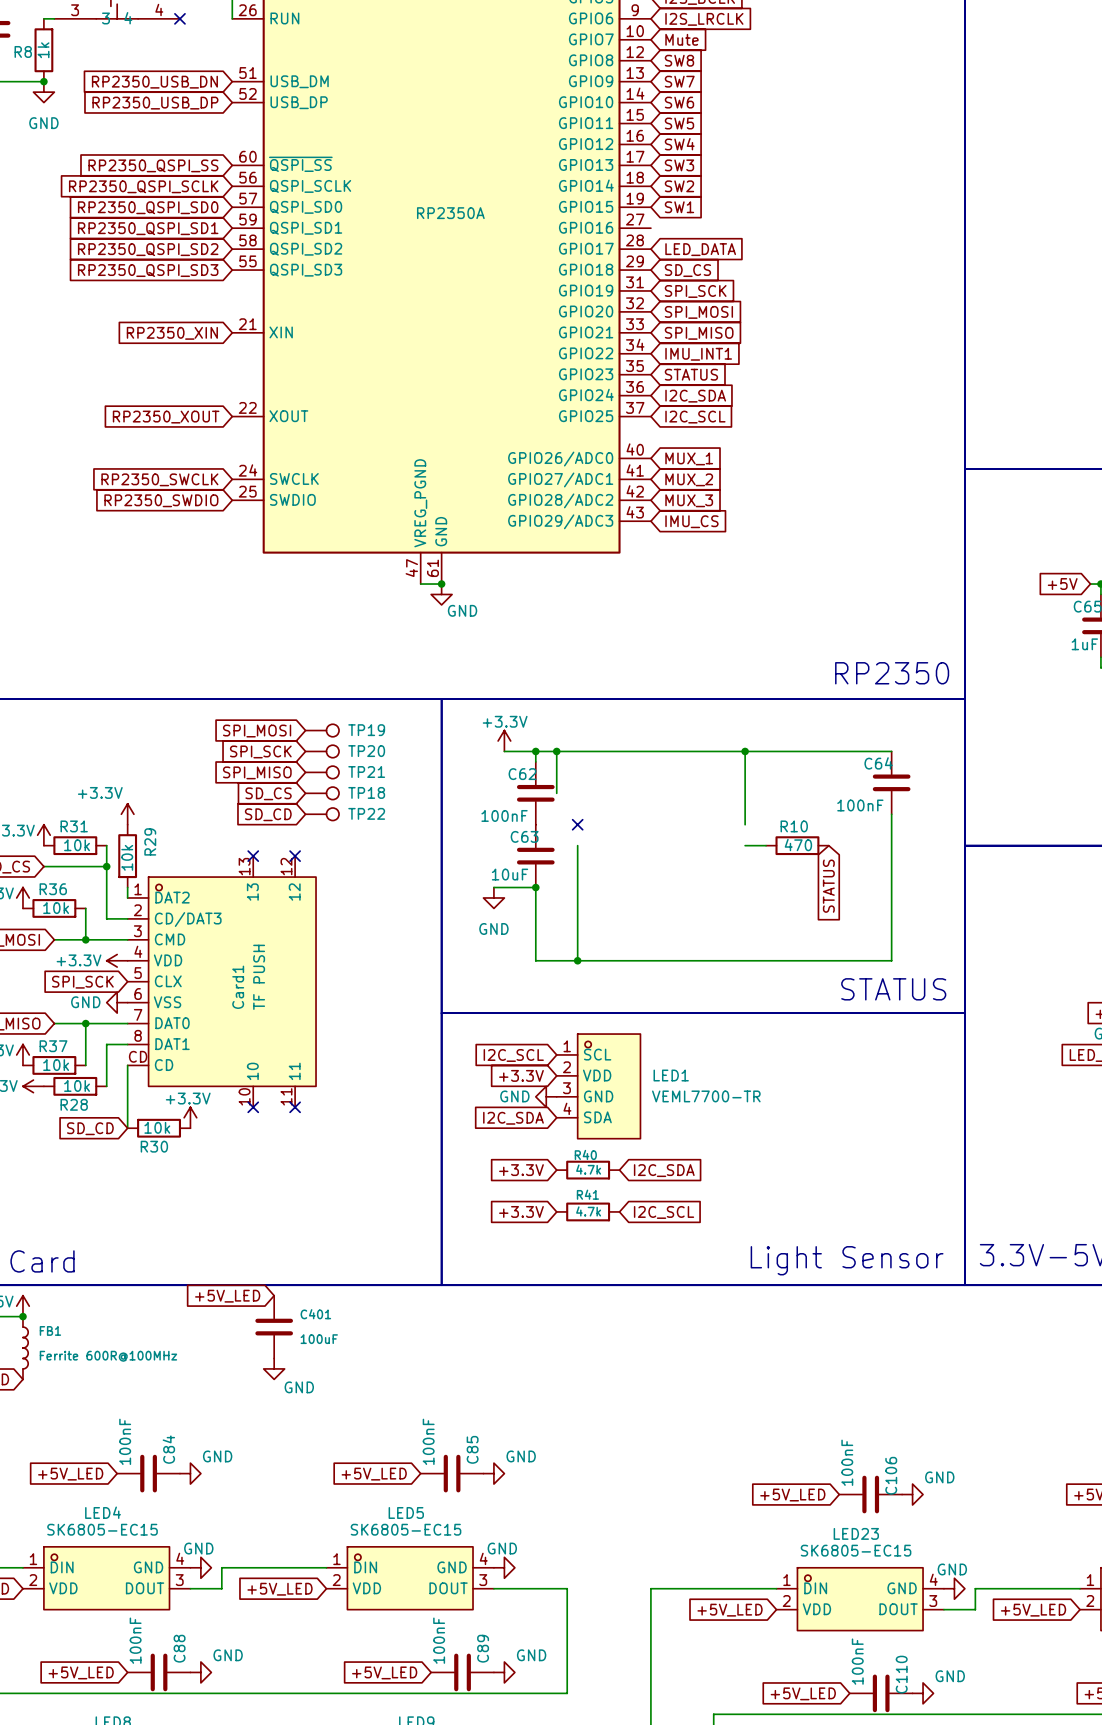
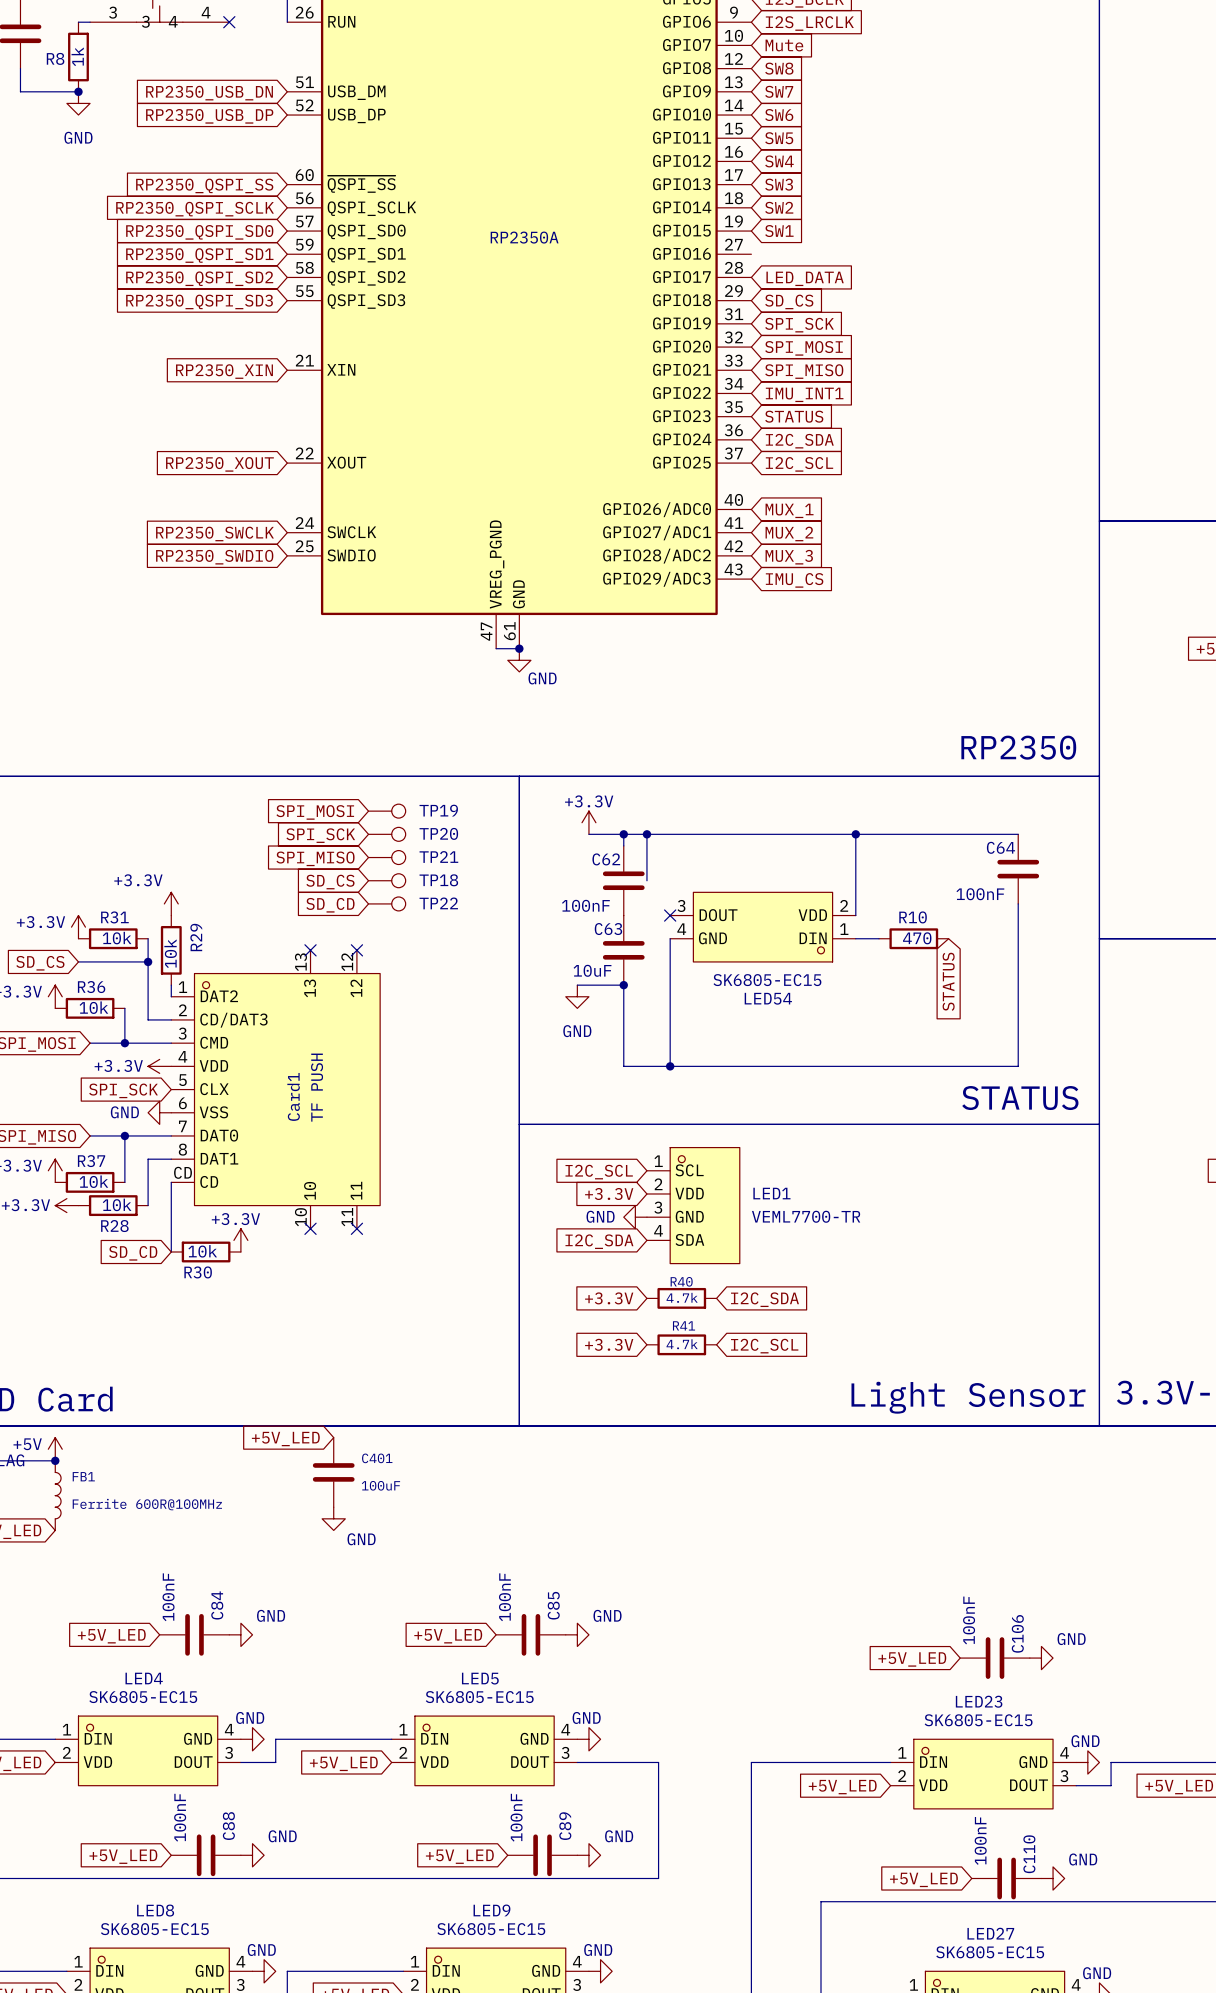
LED54: none -> SK6805-EC15 (762, 927)

